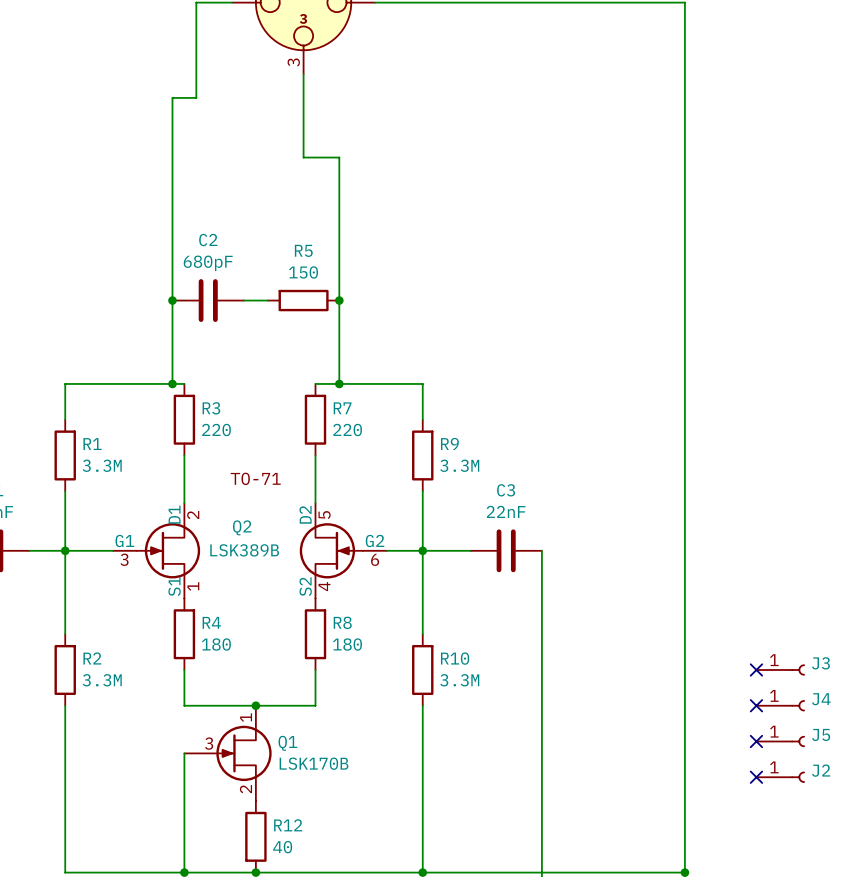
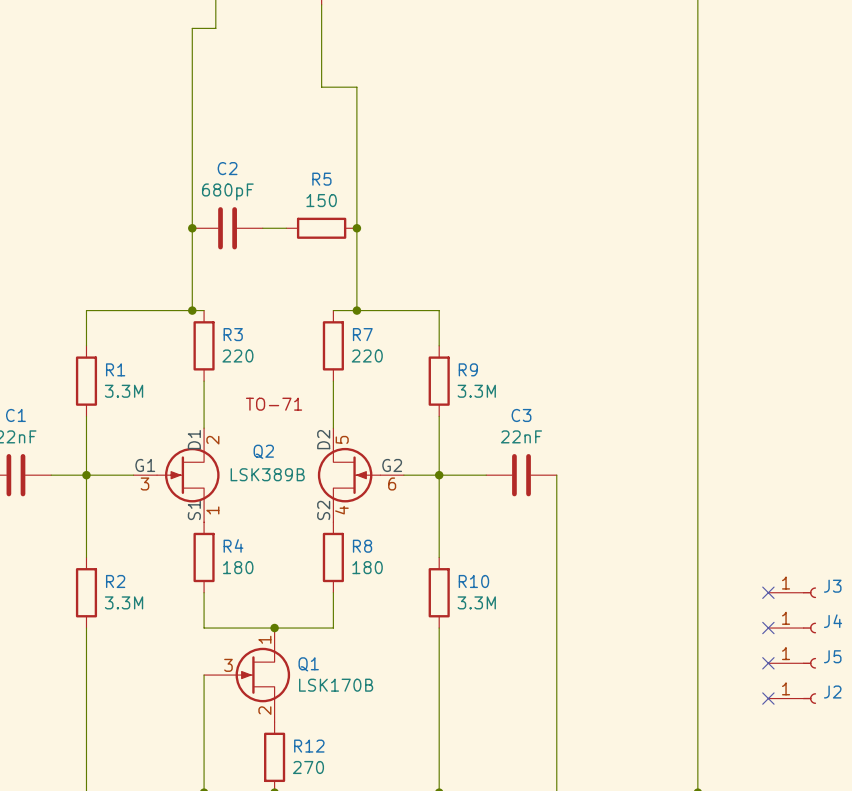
R12 value: 40 (282, 847) -> 270 (308, 767)

